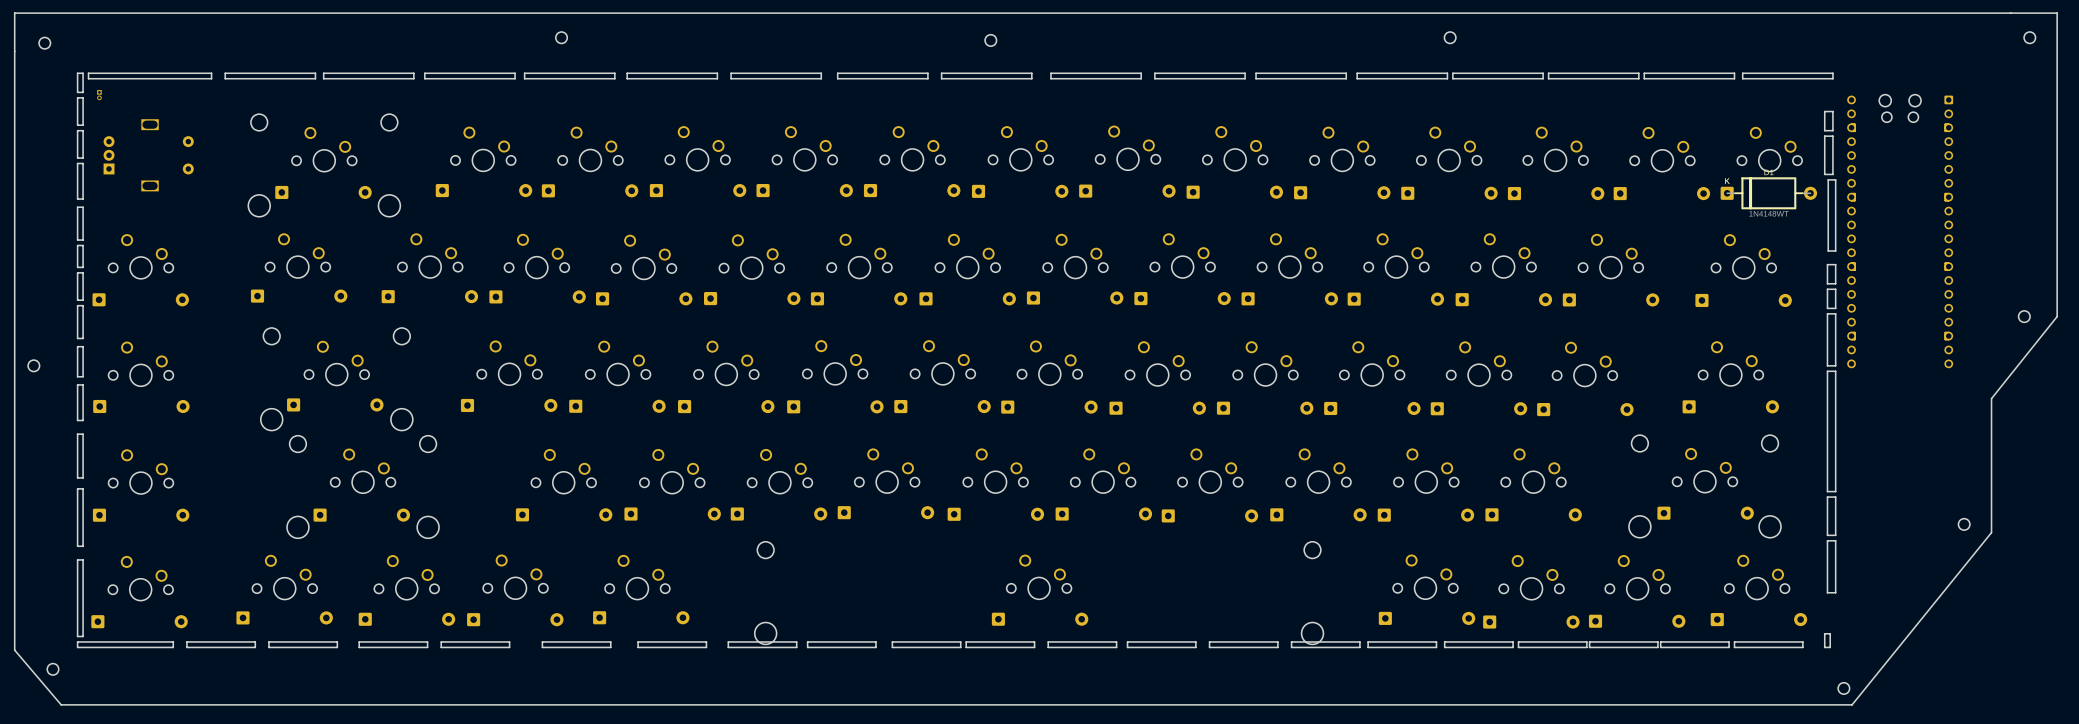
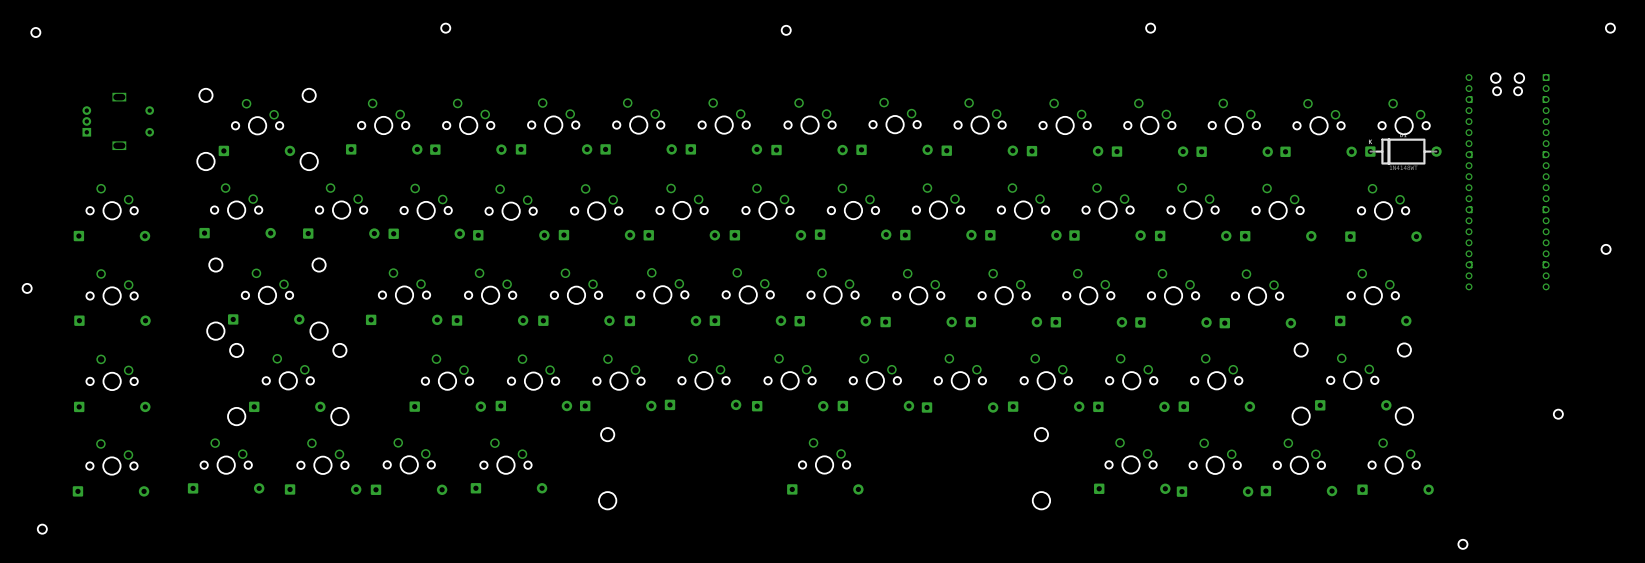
board edge: (2057, 13) (14, 13) (14, 650) (61, 704) (1852, 704) (1991, 532) (1991, 398) (2057, 316) (2057, 13) -> none
board edge: (83, 73) (77, 73) (77, 92) (83, 92) (83, 73) -> none
board edge: (211, 73) (88, 73) (88, 78) (211, 78) (211, 73) -> none
board edge: (315, 73) (225, 73) (225, 78) (315, 78) (315, 73) -> none
board edge: (413, 73) (323, 73) (323, 78) (413, 78) (413, 73) -> none
board edge: (515, 73) (424, 73) (424, 78) (515, 78) (515, 73) -> none
board edge: (614, 73) (524, 73) (524, 78) (614, 78) (614, 73) -> none
board edge: (717, 73) (627, 73) (627, 78) (717, 78) (717, 73) -> none
board edge: (821, 73) (731, 73) (731, 78) (821, 78) (821, 73) -> none
board edge: (927, 73) (837, 73) (837, 78) (927, 78) (927, 73) -> none
board edge: (1031, 73) (941, 73) (941, 78) (1031, 78) (1031, 73) -> none
board edge: (1141, 73) (1050, 73) (1050, 78) (1141, 78) (1141, 73) -> none
board edge: (1245, 73) (1154, 73) (1154, 78) (1245, 78) (1245, 73) -> none
board edge: (1346, 73) (1256, 73) (1256, 78) (1346, 78) (1346, 73) -> none
board edge: (1447, 73) (1357, 73) (1357, 78) (1447, 78) (1447, 73) -> none
board edge: (1543, 73) (1452, 73) (1452, 78) (1543, 78) (1543, 73) -> none
board edge: (1638, 73) (1548, 73) (1548, 78) (1638, 78) (1638, 73) -> none
board edge: (1734, 73) (1644, 73) (1644, 78) (1734, 78) (1734, 73) -> none
board edge: (1832, 73) (1742, 73) (1742, 78) (1832, 78) (1832, 73) -> none
part: (99, 95) -> none
board edge: (83, 97) (83, 125) (77, 125) (77, 97) (83, 97) -> none
board edge: (1832, 111) (1832, 130) (1824, 130) (1824, 111) (1832, 111) -> none
board edge: (83, 130) (83, 158) (77, 158) (77, 130) (83, 130) -> none
board edge: (1832, 136) (1824, 136) (1824, 174) (1832, 174) (1832, 136) -> none
board edge: (83, 163) (83, 199) (77, 199) (77, 163) (83, 163) -> none
board edge: (1835, 179) (1828, 179) (1828, 250) (1835, 250) (1835, 179) -> none
board edge: (83, 207) (83, 240) (77, 240) (77, 207) (83, 207) -> none
board edge: (83, 245) (83, 267) (77, 267) (77, 245) (83, 245) -> none
board edge: (1835, 264) (1835, 283) (1827, 283) (1827, 264) (1835, 264) -> none
board edge: (83, 272) (83, 300) (77, 300) (77, 272) (83, 272) -> none
board edge: (1835, 289) (1835, 308) (1827, 308) (1827, 289) (1835, 289) -> none
board edge: (83, 305) (77, 305) (77, 338) (83, 338) (83, 305) -> none
board edge: (1835, 313) (1835, 365) (1827, 365) (1827, 313) (1835, 313) -> none
board edge: (83, 346) (83, 376) (77, 376) (77, 346) (83, 346) -> none
board edge: (1835, 371) (1835, 491) (1827, 491) (1827, 371) (1835, 371) -> none
board edge: (83, 384) (83, 420) (77, 420) (77, 384) (83, 384) -> none
board edge: (83, 434) (83, 477) (77, 477) (77, 434) (83, 434) -> none
board edge: (83, 488) (83, 546) (77, 546) (77, 488) (83, 488) -> none
board edge: (1835, 497) (1835, 535) (1827, 535) (1827, 497) (1835, 497) -> none
board edge: (1835, 540) (1835, 592) (1827, 592) (1827, 540) (1835, 540) -> none
board edge: (83, 559) (83, 636) (77, 636) (77, 559) (83, 559) -> none
board edge: (1830, 633) (1824, 633) (1824, 647) (1830, 647) (1830, 633) -> none
board edge: (173, 641) (77, 641) (77, 647) (173, 647) (173, 641) -> none
board edge: (255, 641) (186, 641) (186, 647) (255, 647) (255, 641) -> none
board edge: (337, 641) (268, 641) (268, 647) (337, 647) (337, 641) -> none
board edge: (427, 641) (359, 641) (359, 647) (427, 647) (427, 641) -> none
board edge: (509, 641) (441, 641) (441, 647) (509, 647) (509, 641) -> none
board edge: (610, 641) (542, 641) (542, 647) (610, 647) (610, 641) -> none
board edge: (706, 641) (638, 641) (638, 647) (706, 647) (706, 641) -> none
board edge: (796, 641) (728, 641) (728, 647) (796, 647) (796, 641) -> none
board edge: (875, 641) (807, 641) (807, 647) (875, 647) (875, 641) -> none
board edge: (960, 641) (892, 641) (892, 647) (960, 647) (960, 641) -> none
board edge: (1034, 641) (966, 641) (966, 647) (1034, 647) (1034, 641) -> none
board edge: (1116, 641) (1048, 641) (1048, 647) (1116, 647) (1116, 641) -> none
board edge: (1195, 641) (1127, 641) (1127, 647) (1195, 647) (1195, 641) -> none
board edge: (1277, 641) (1209, 641) (1209, 647) (1277, 647) (1277, 641) -> none
board edge: (1359, 641) (1291, 641) (1291, 647) (1359, 647) (1359, 641) -> none
board edge: (1436, 641) (1368, 641) (1368, 647) (1436, 647) (1436, 641) -> none
board edge: (1513, 641) (1444, 641) (1444, 647) (1513, 647) (1513, 641) -> none
board edge: (1586, 641) (1518, 641) (1518, 647) (1586, 647) (1586, 641) -> none
board edge: (1657, 641) (1589, 641) (1589, 647) (1657, 647) (1657, 641) -> none
board edge: (1729, 641) (1660, 641) (1660, 647) (1729, 647) (1729, 641) -> none
board edge: (1802, 641) (1734, 641) (1734, 647) (1802, 647) (1802, 641) -> none

